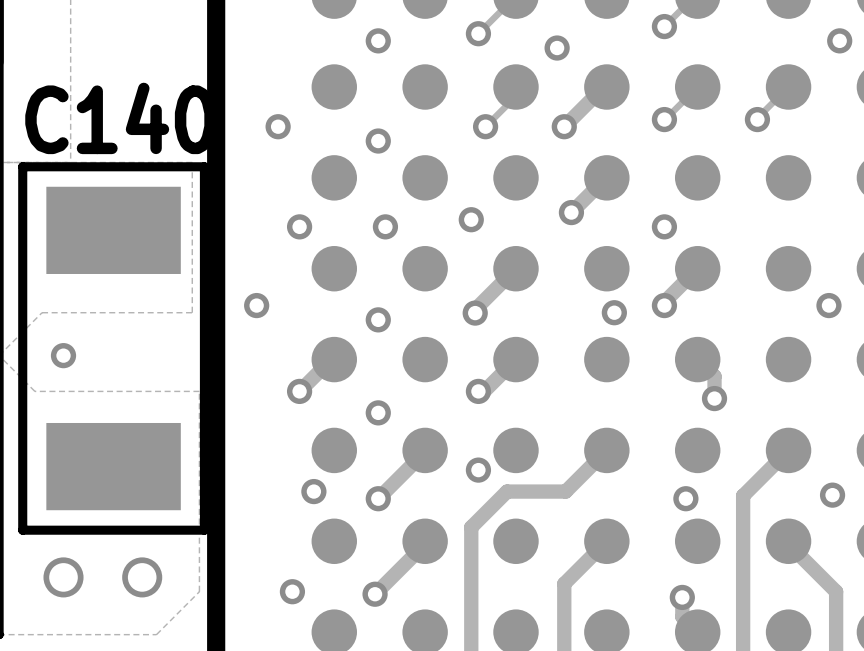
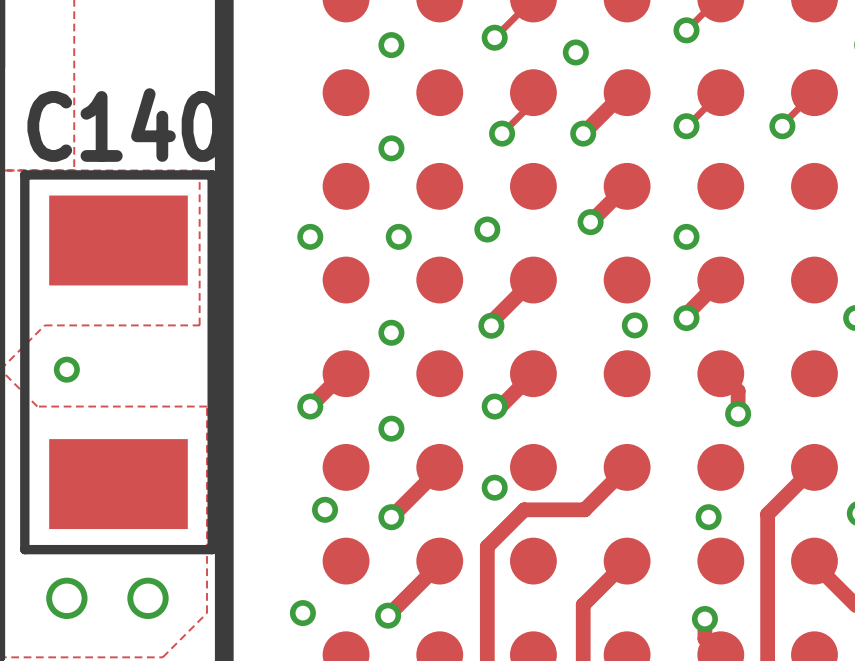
via: (278, 126) -> none
via: (256, 305) -> none

